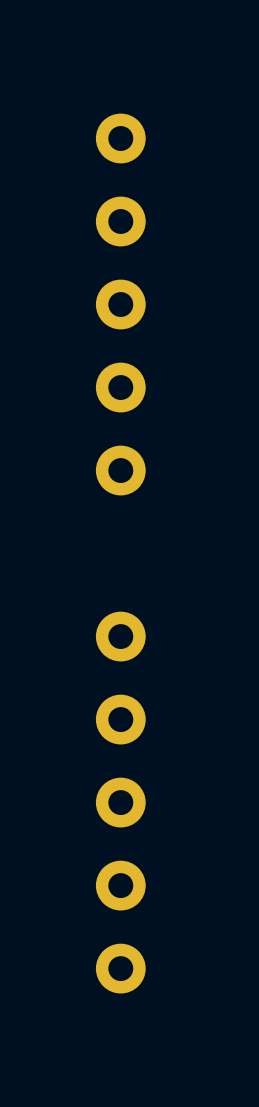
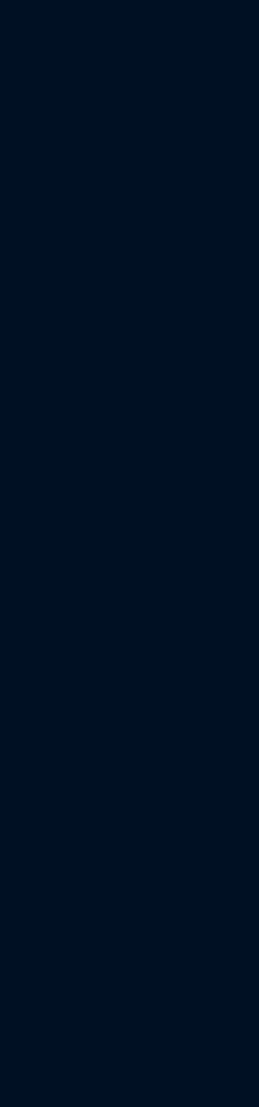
part: (120, 304) -> none
part: (120, 802) -> none

